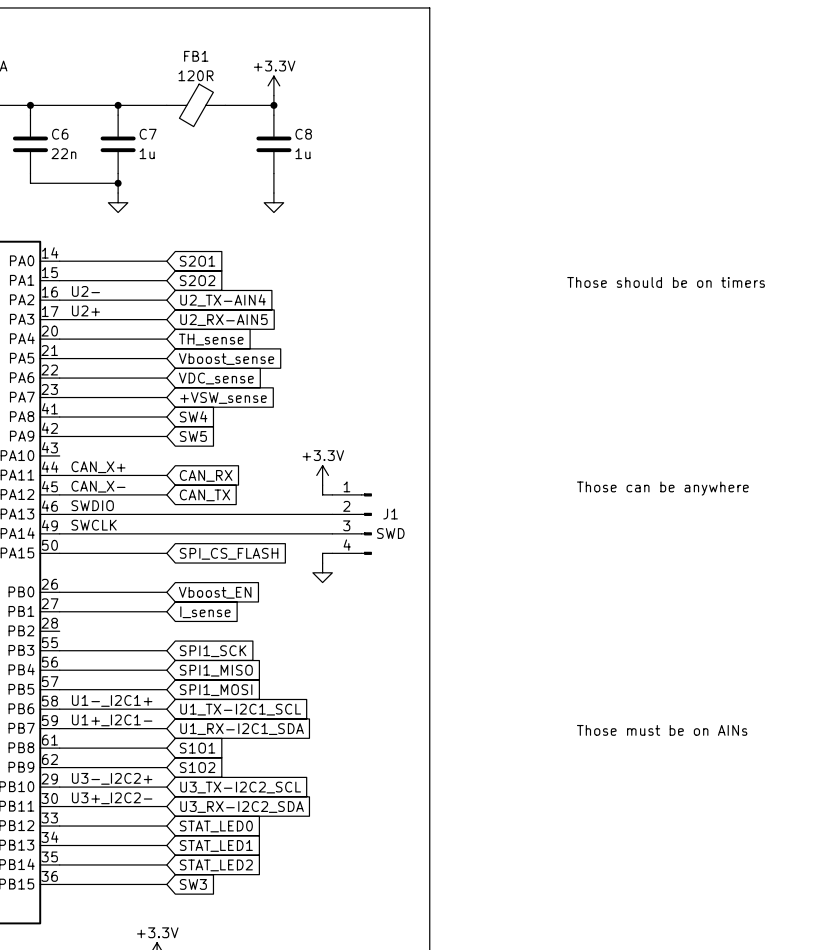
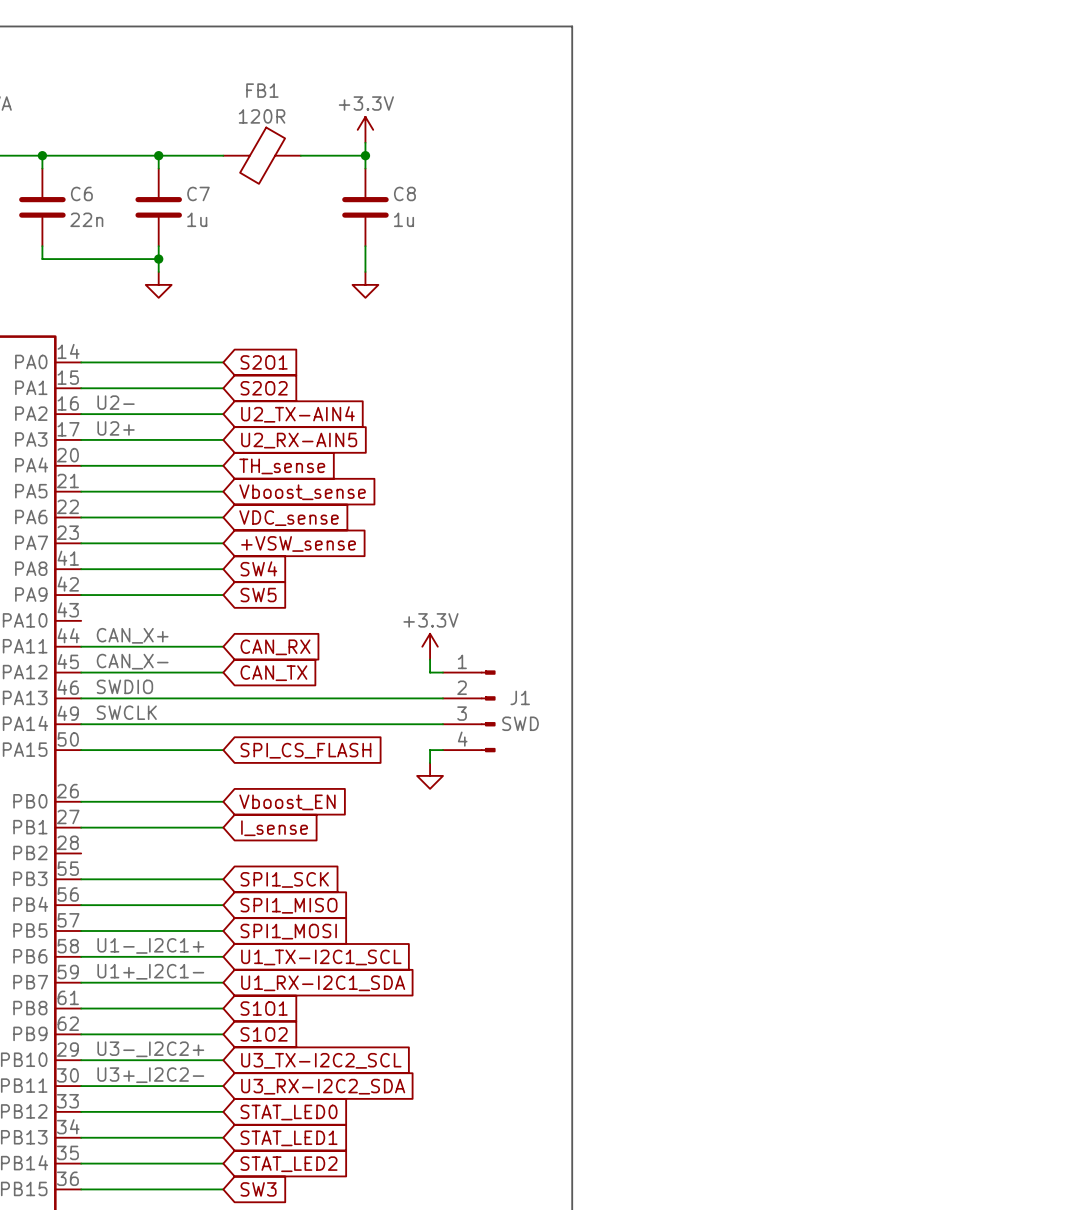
text: Those should be on timers (666, 282) -> none
text: Those can be anywhere (662, 488) -> none
text: Those must be on AINs (662, 730) -> none

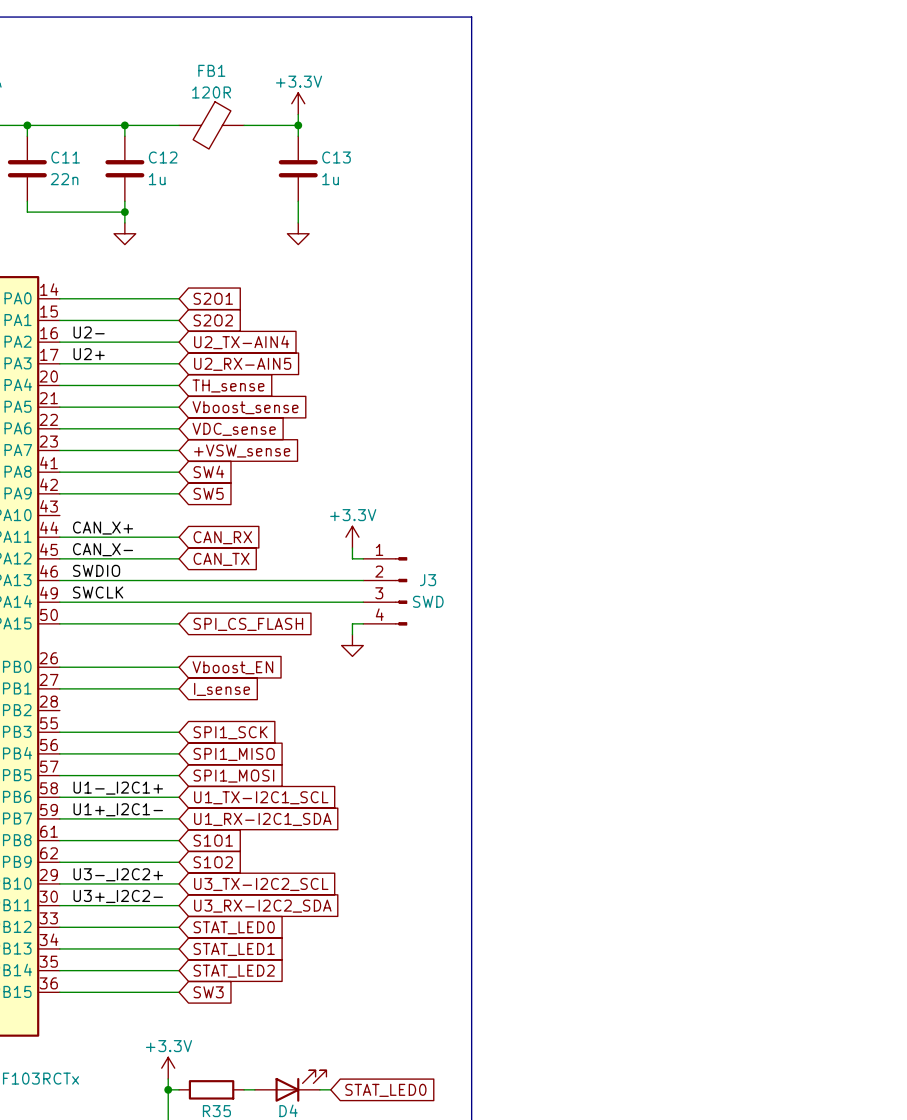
C6 name: C6 (81, 193) -> C11 (65, 157)
C7 name: C7 (198, 193) -> C12 (163, 157)
C8 name: C8 (404, 193) -> C13 (336, 157)
J1 name: J1 (520, 697) -> J3 (428, 580)

